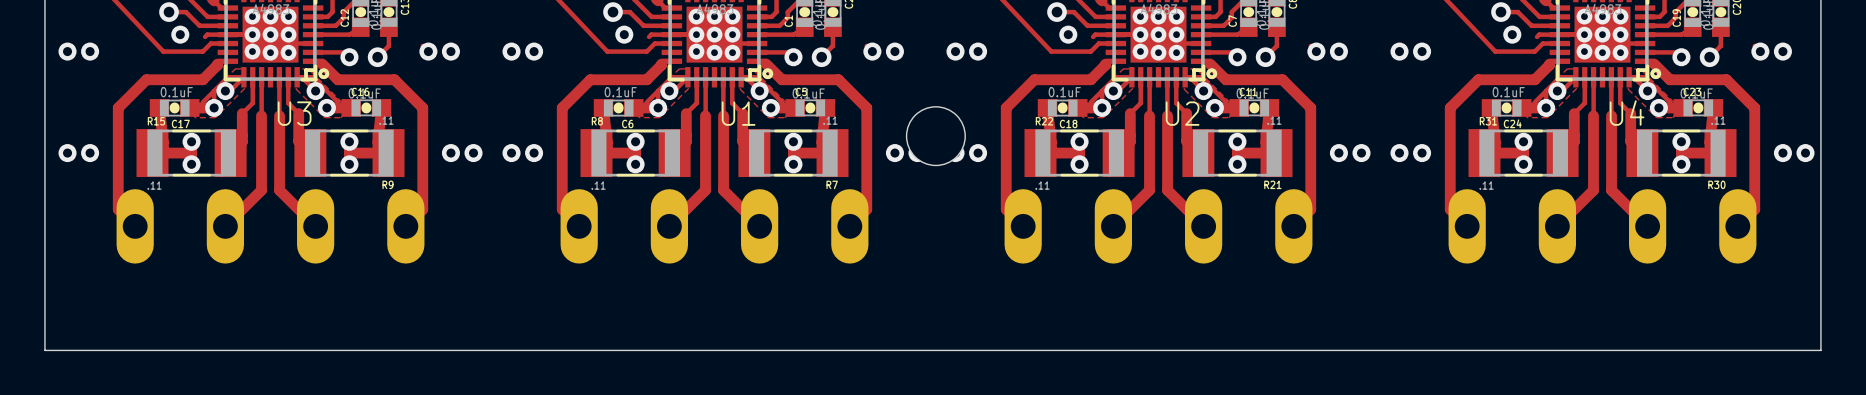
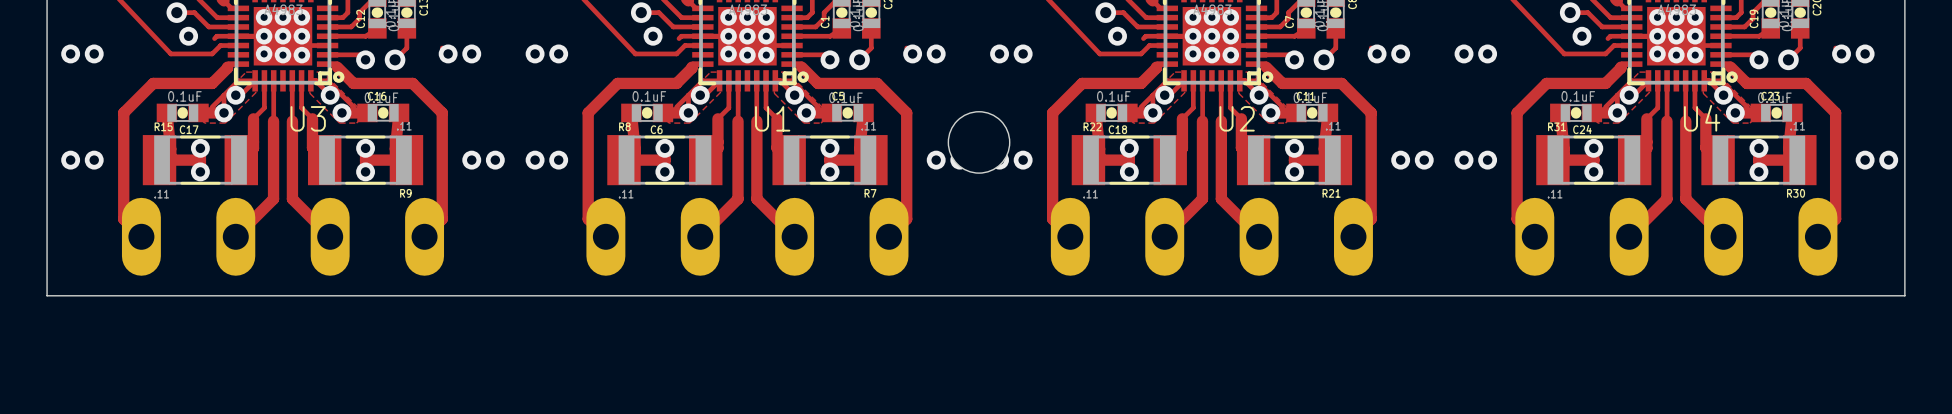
board edge: (44, 282) (44, 350) (1820, 350) (1820, 282) -> (47, 295) (1904, 295)

